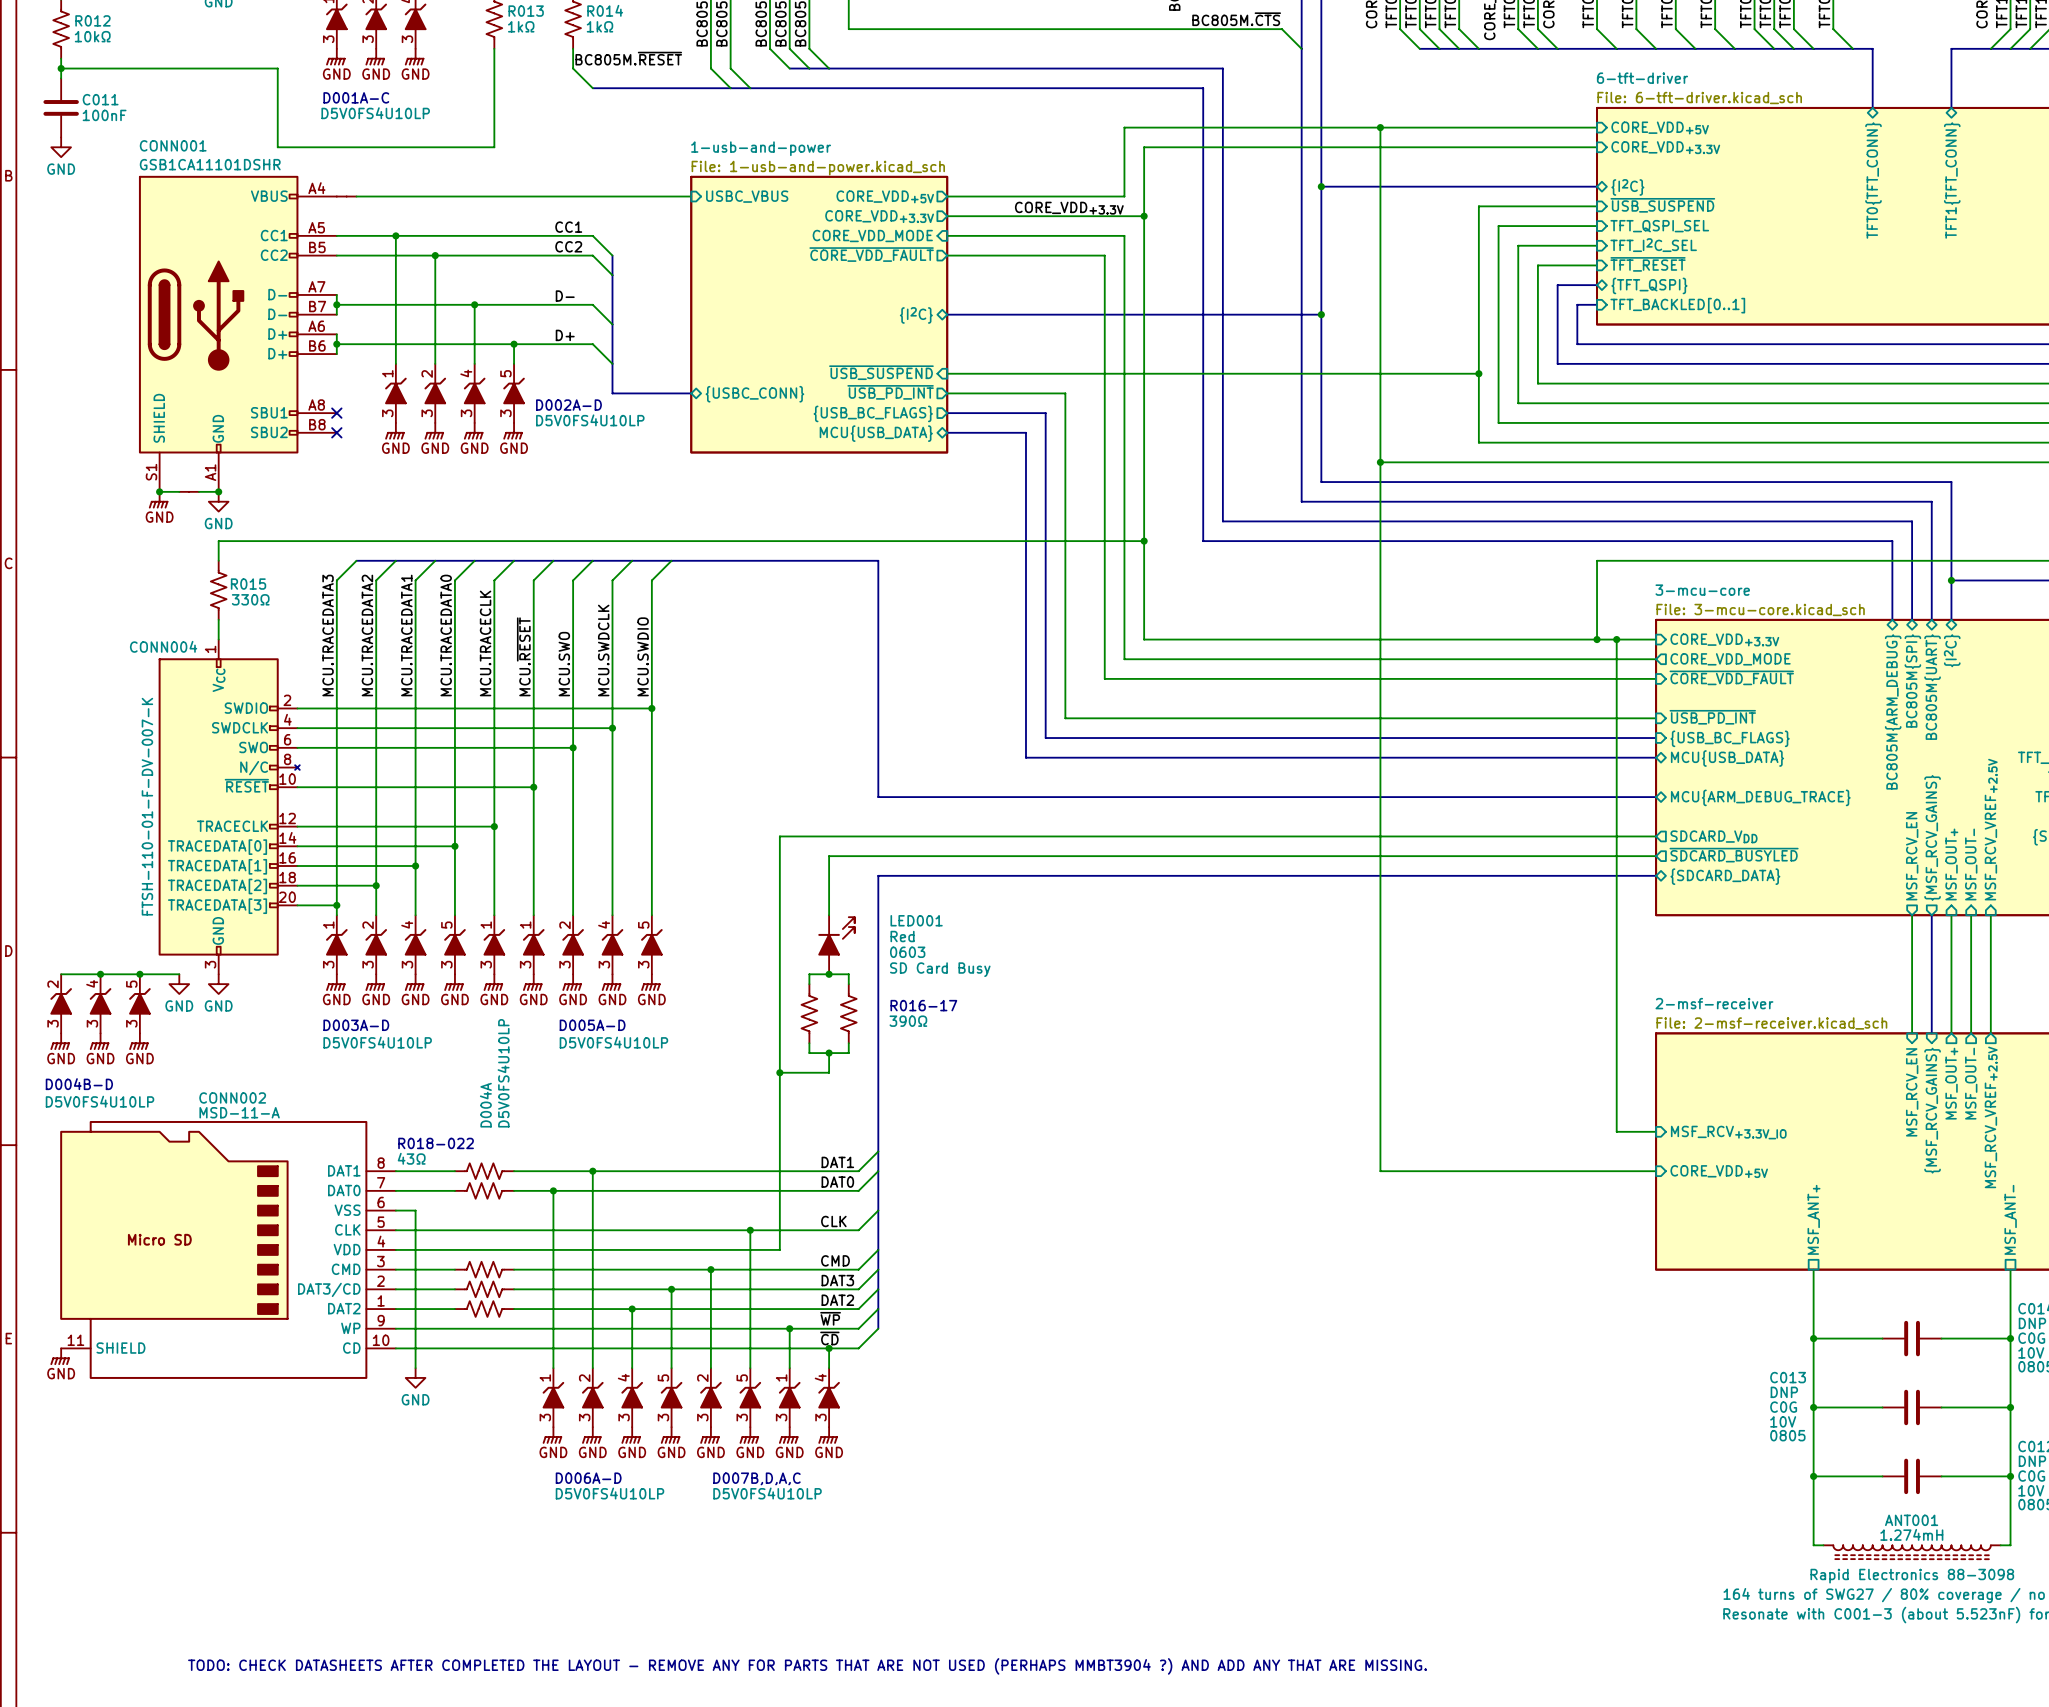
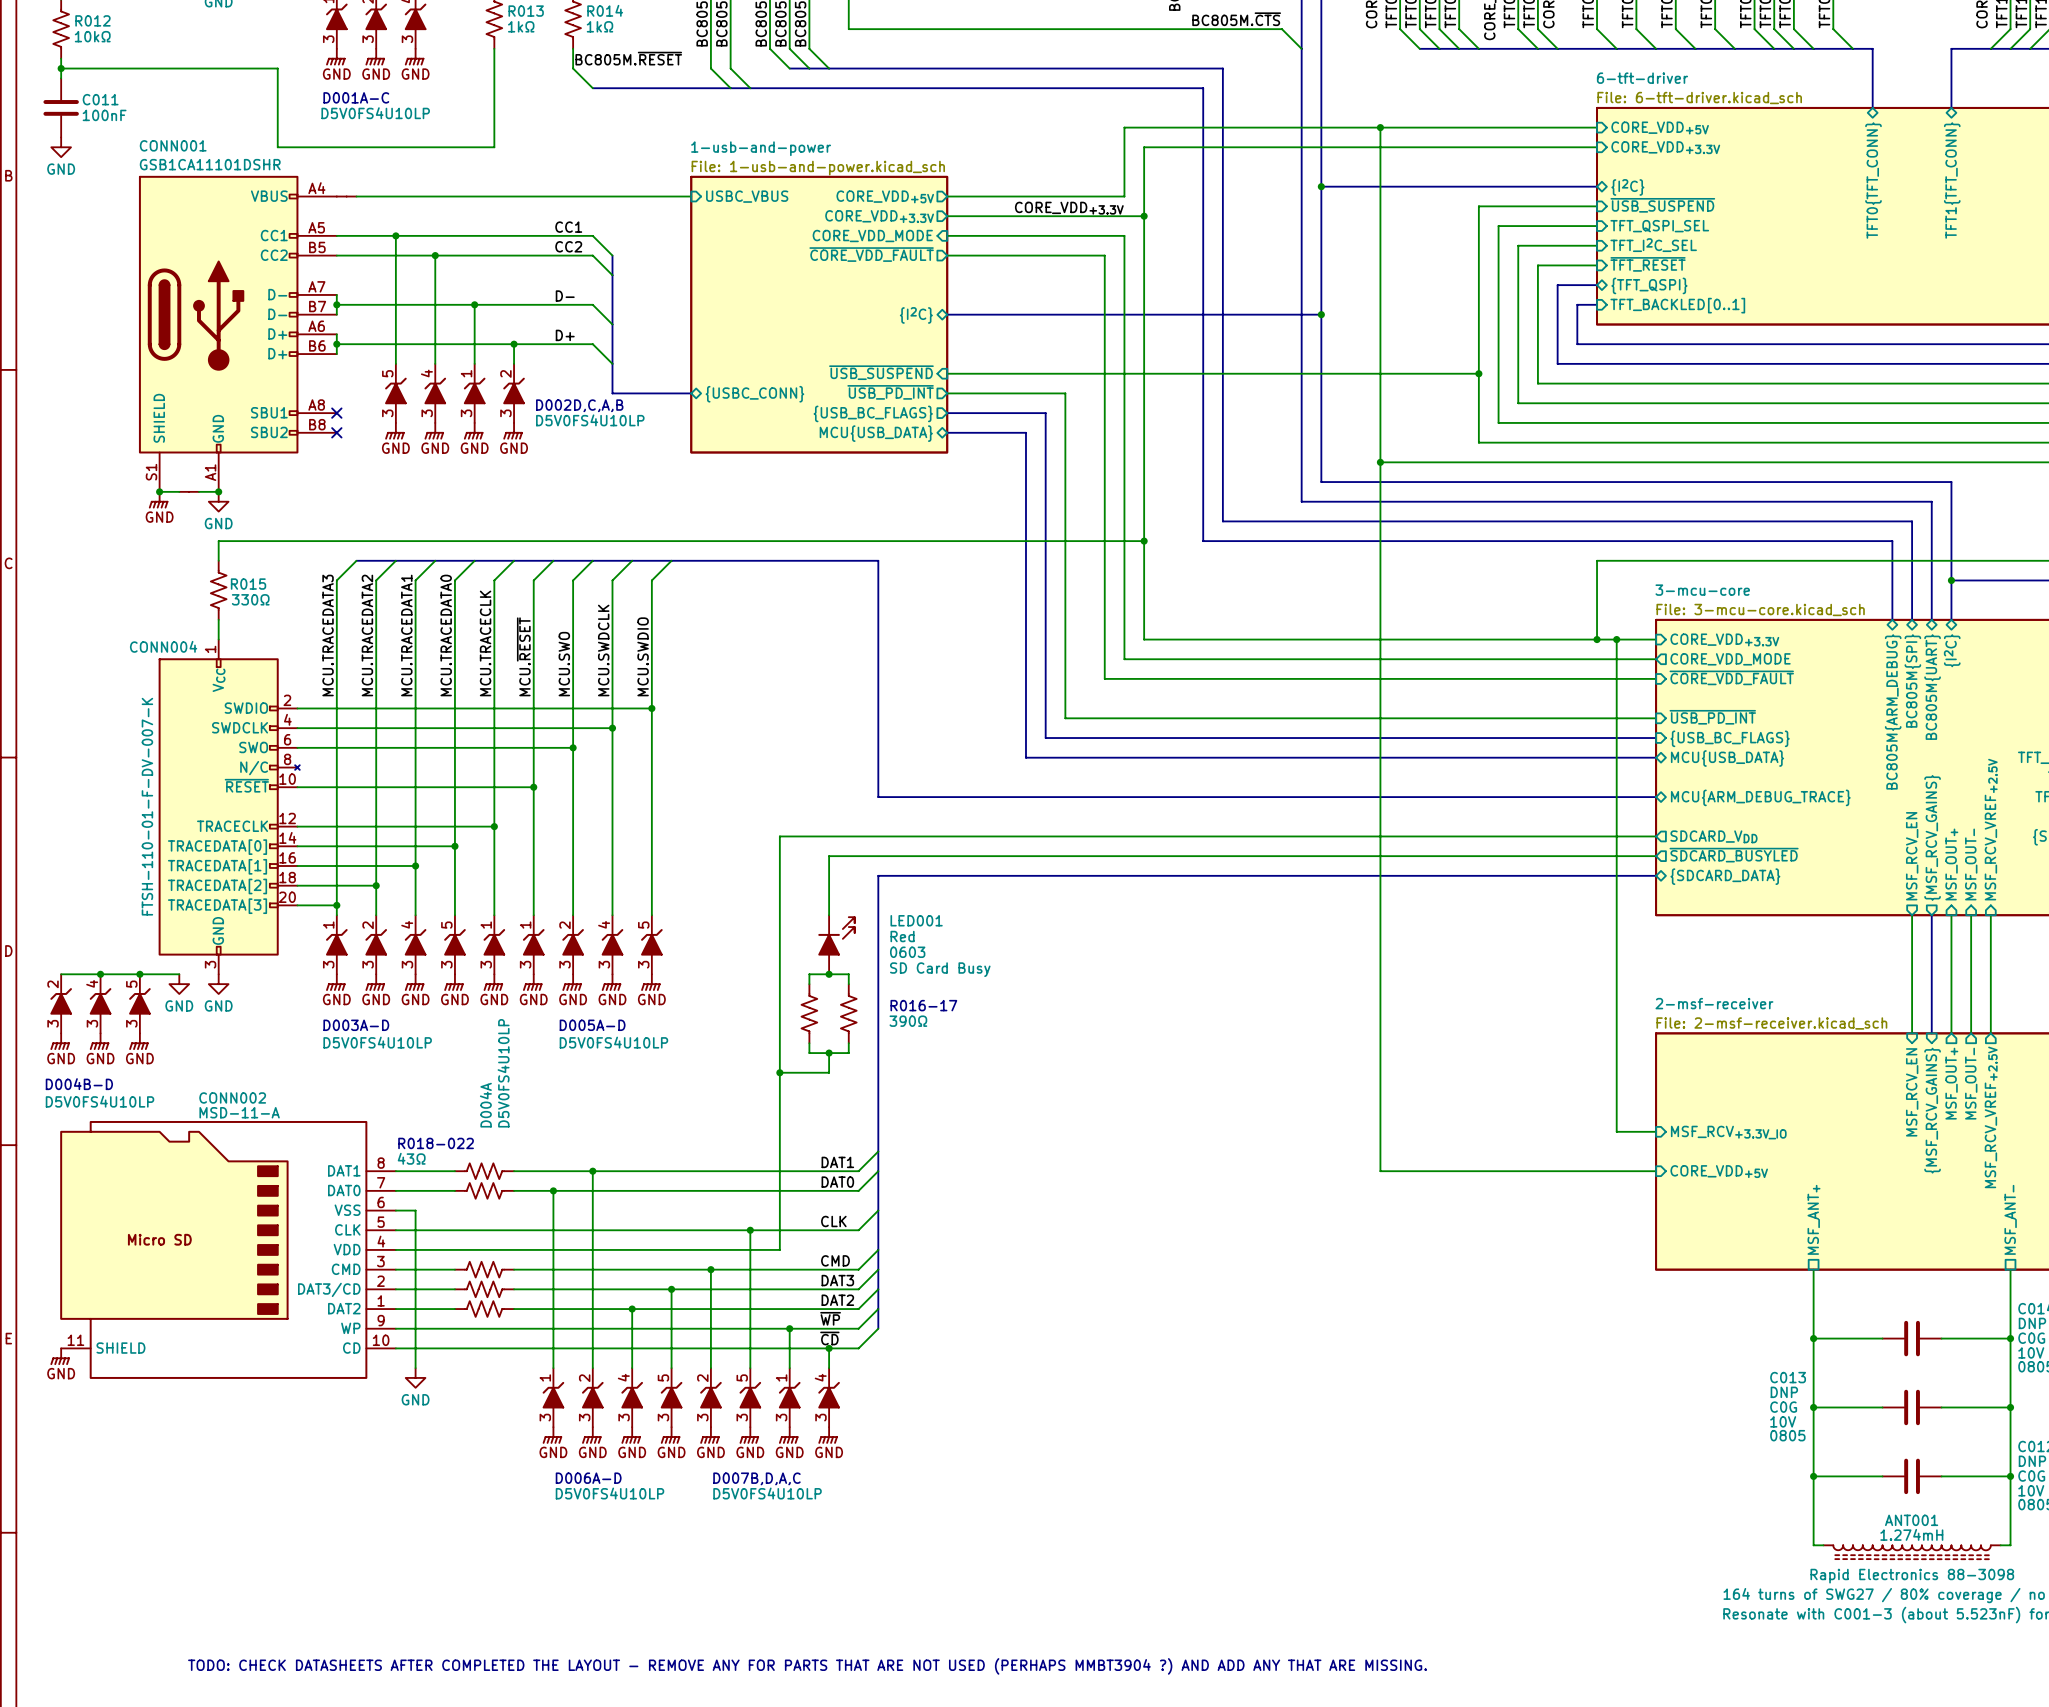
part pin number: 1 (387, 373) -> 5 (387, 373)
part pin number: 2 (427, 373) -> 4 (426, 373)
part pin number: 4 (466, 373) -> 1 (466, 373)
part pin number: 5 (505, 373) -> 2 (505, 373)
text: D002A-D (568, 405) -> D002D,C,A,B (579, 405)

